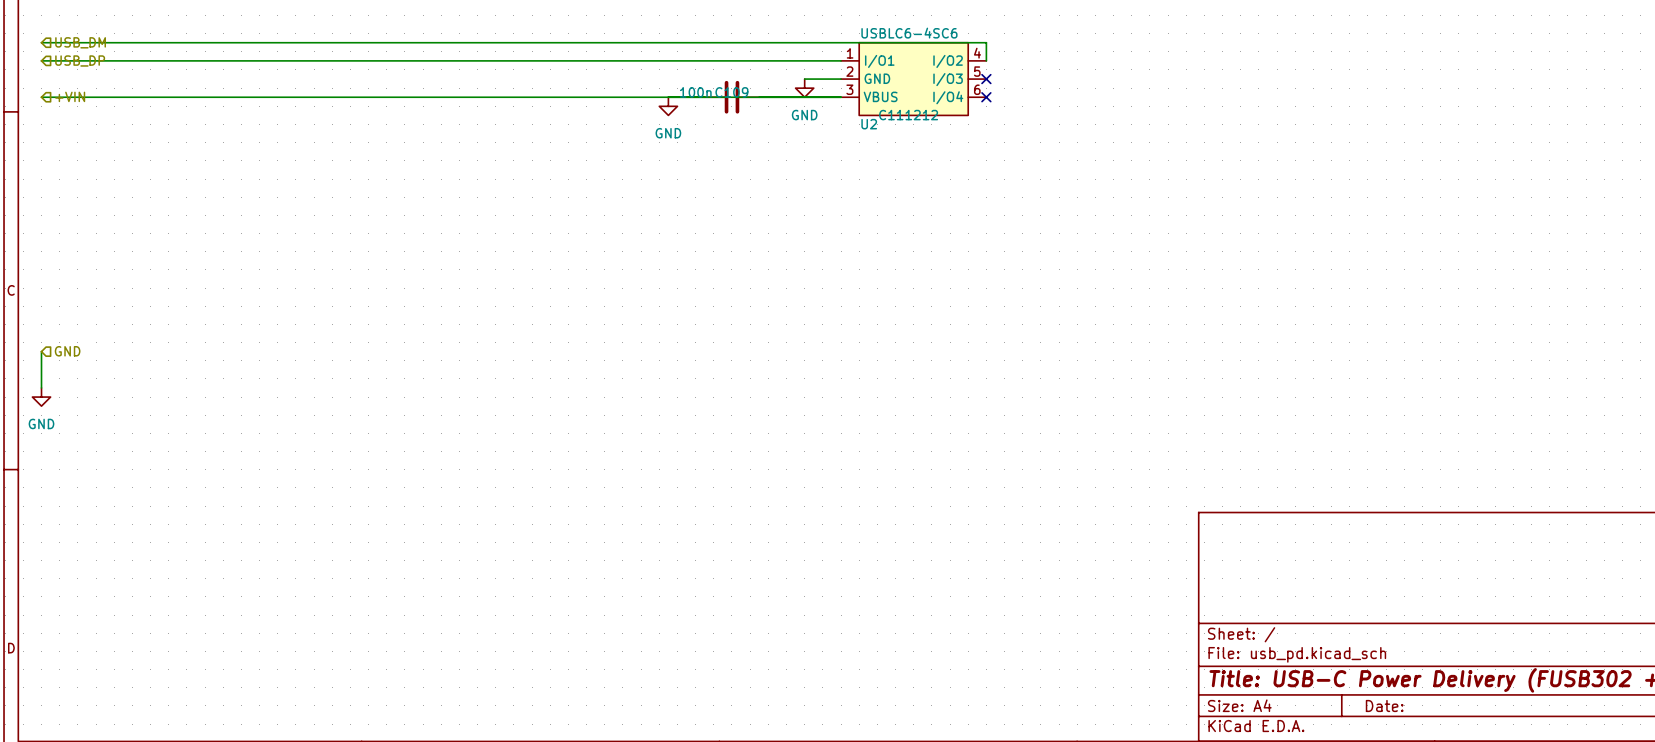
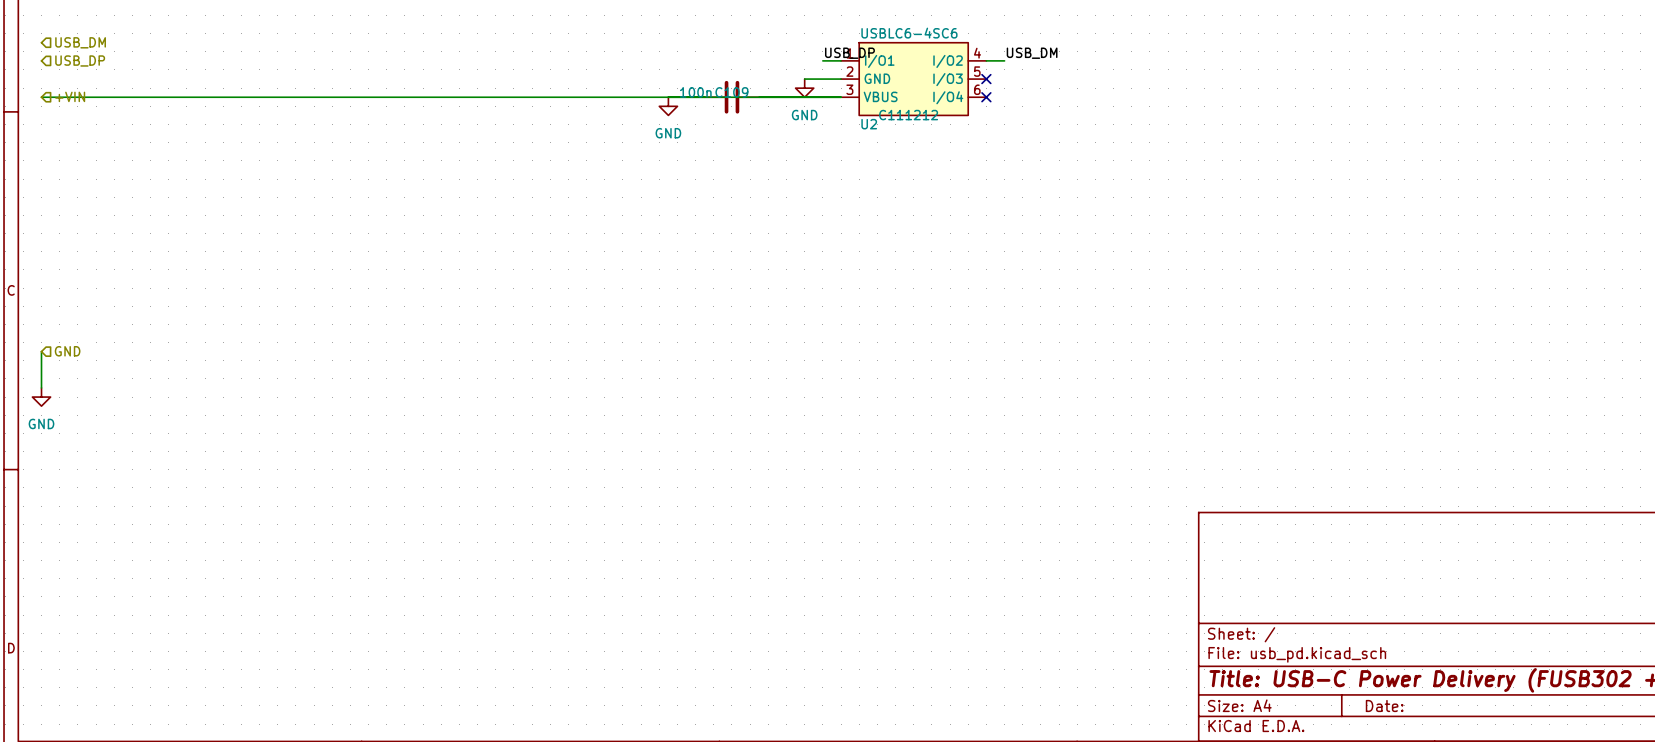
wire: (41, 42) (986, 42) (986, 60) -> (1004, 60) (986, 60)
label: none -> USB_DP (849, 53)
label: none -> USB_DM (1032, 53)
wire: (41, 60) (822, 60) -> none

